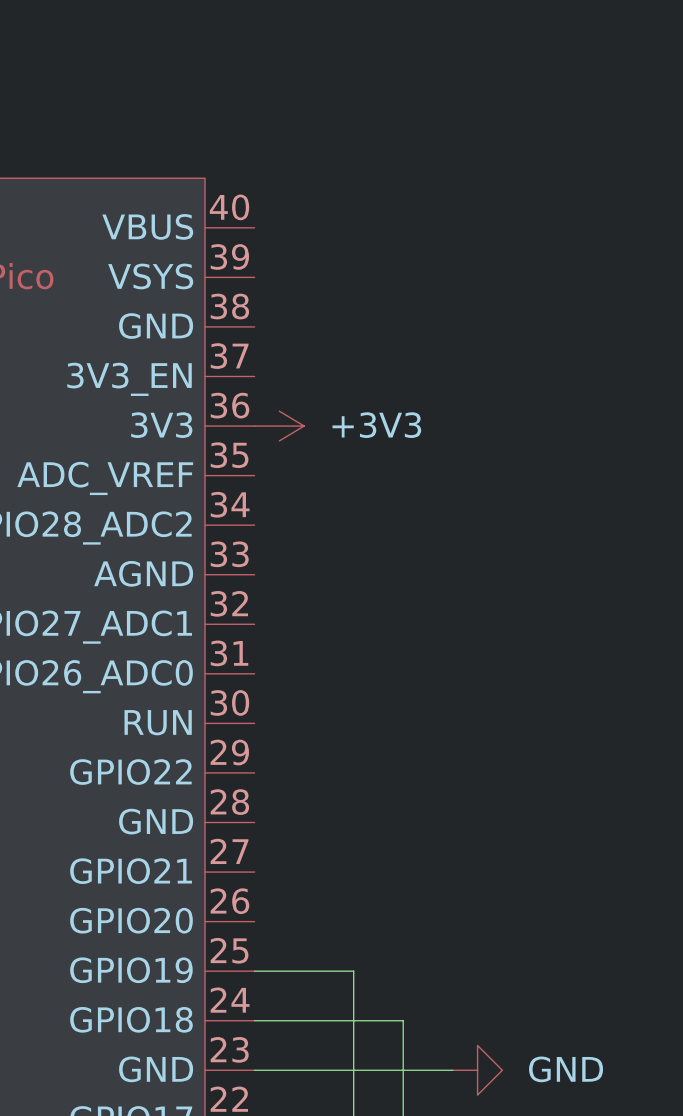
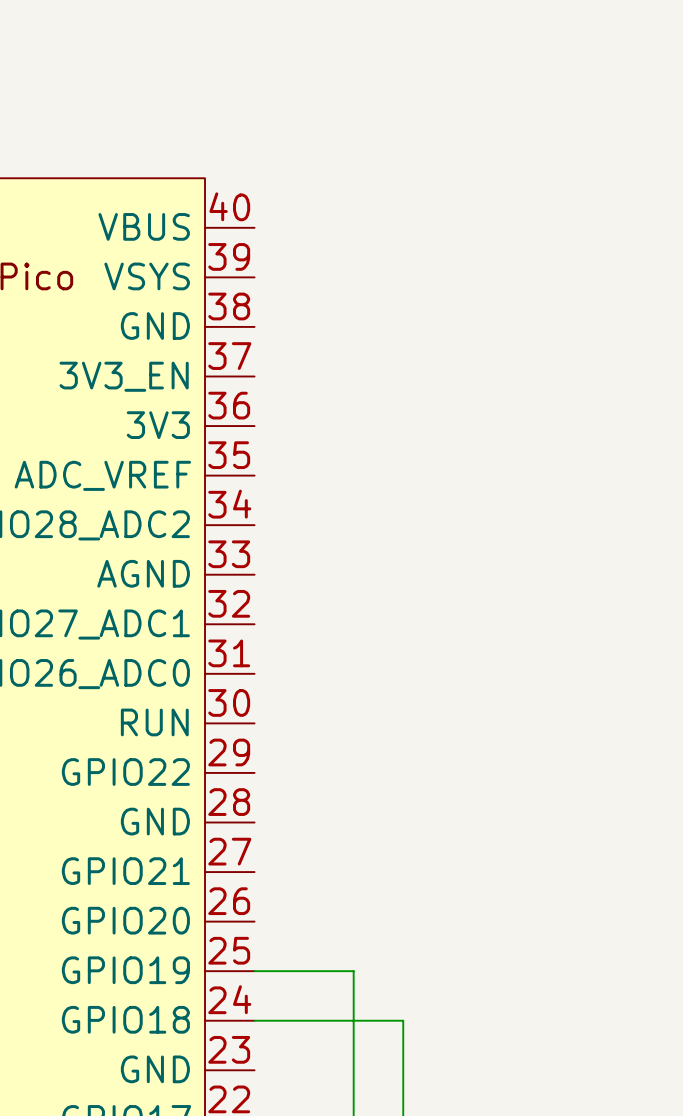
power symbol: +3V3 (279, 426) -> none
wire: (254, 1070) (452, 1070) -> none
power symbol: GND (477, 1070) -> none

